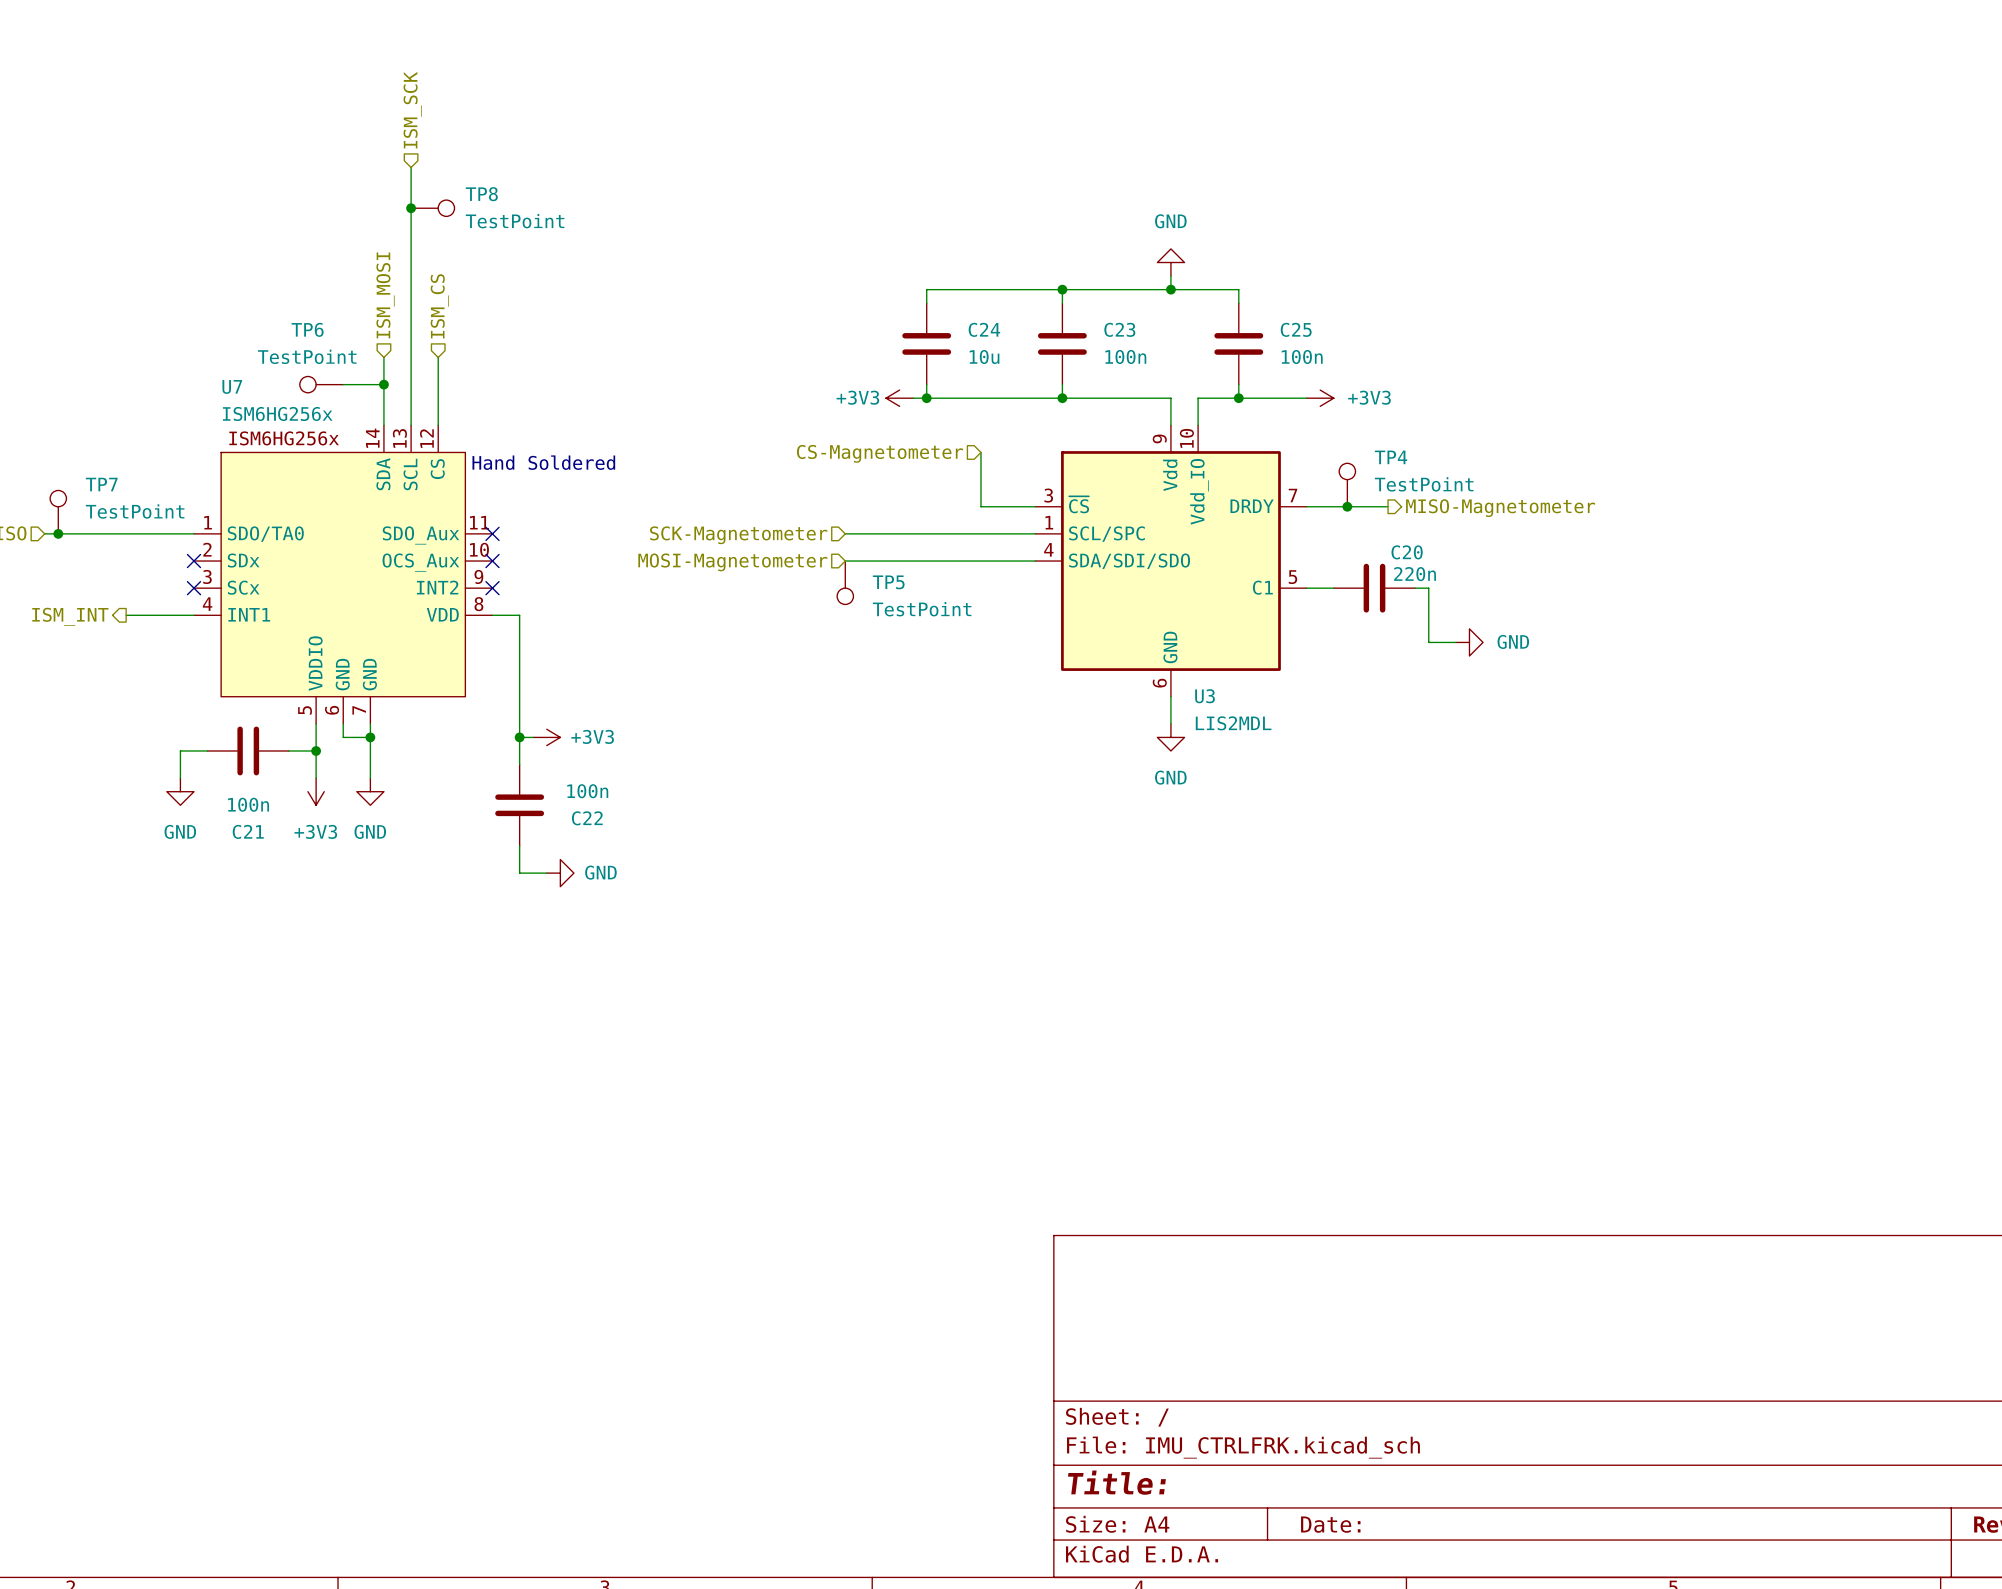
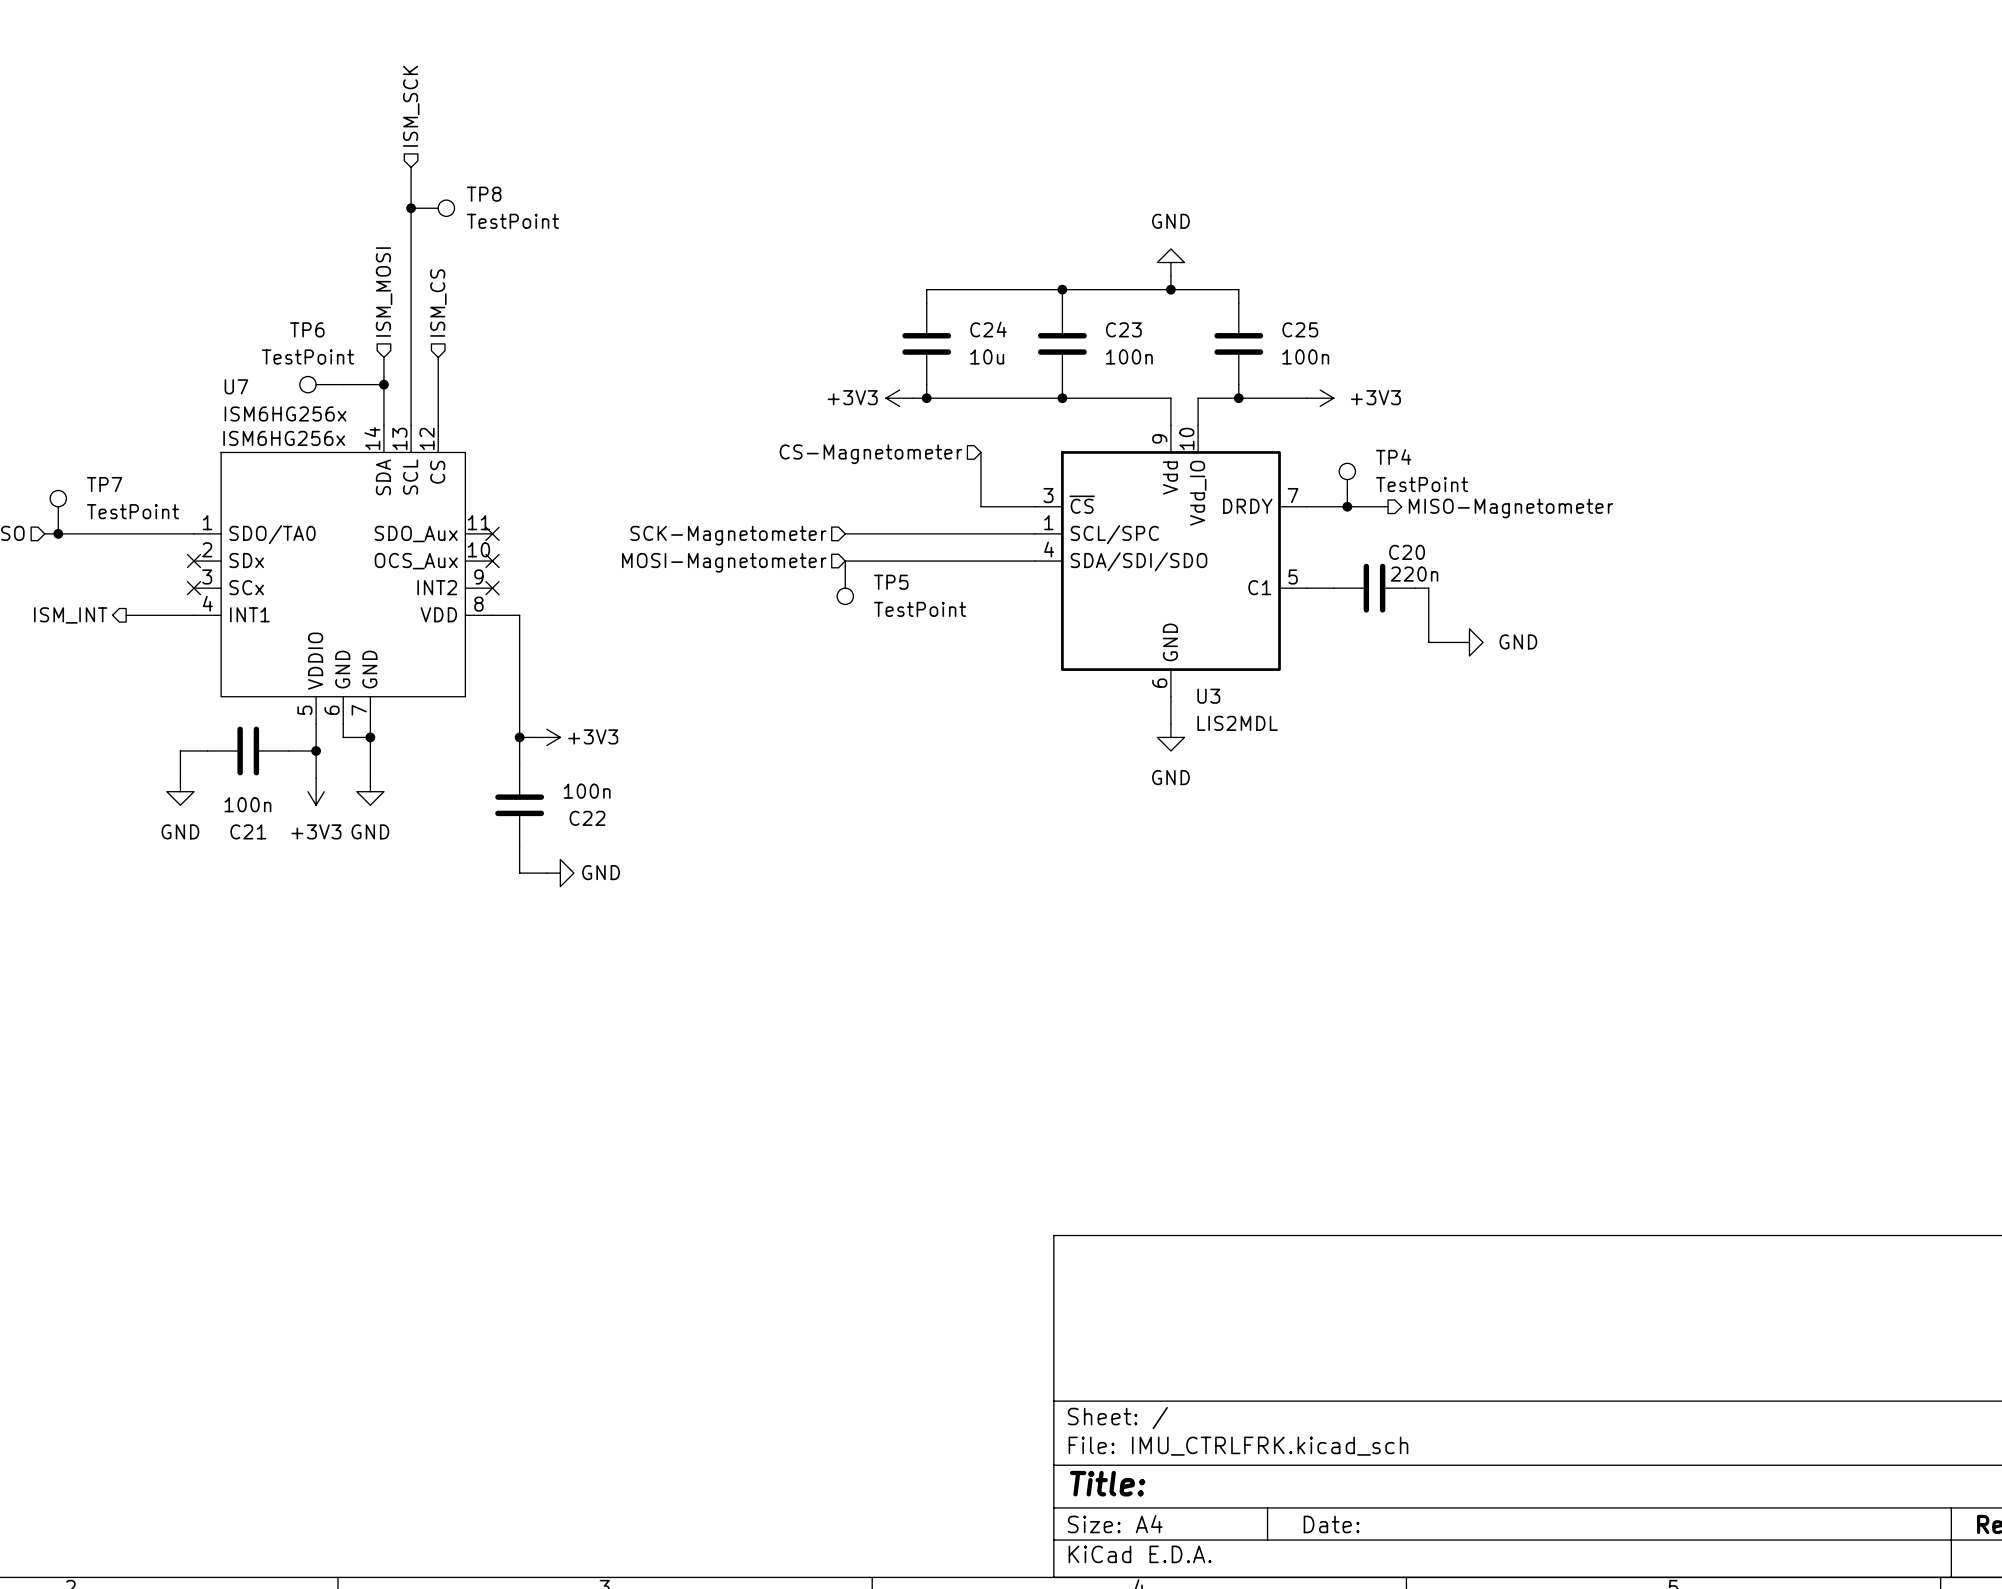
text: Hand Soldered (543, 462) -> none

